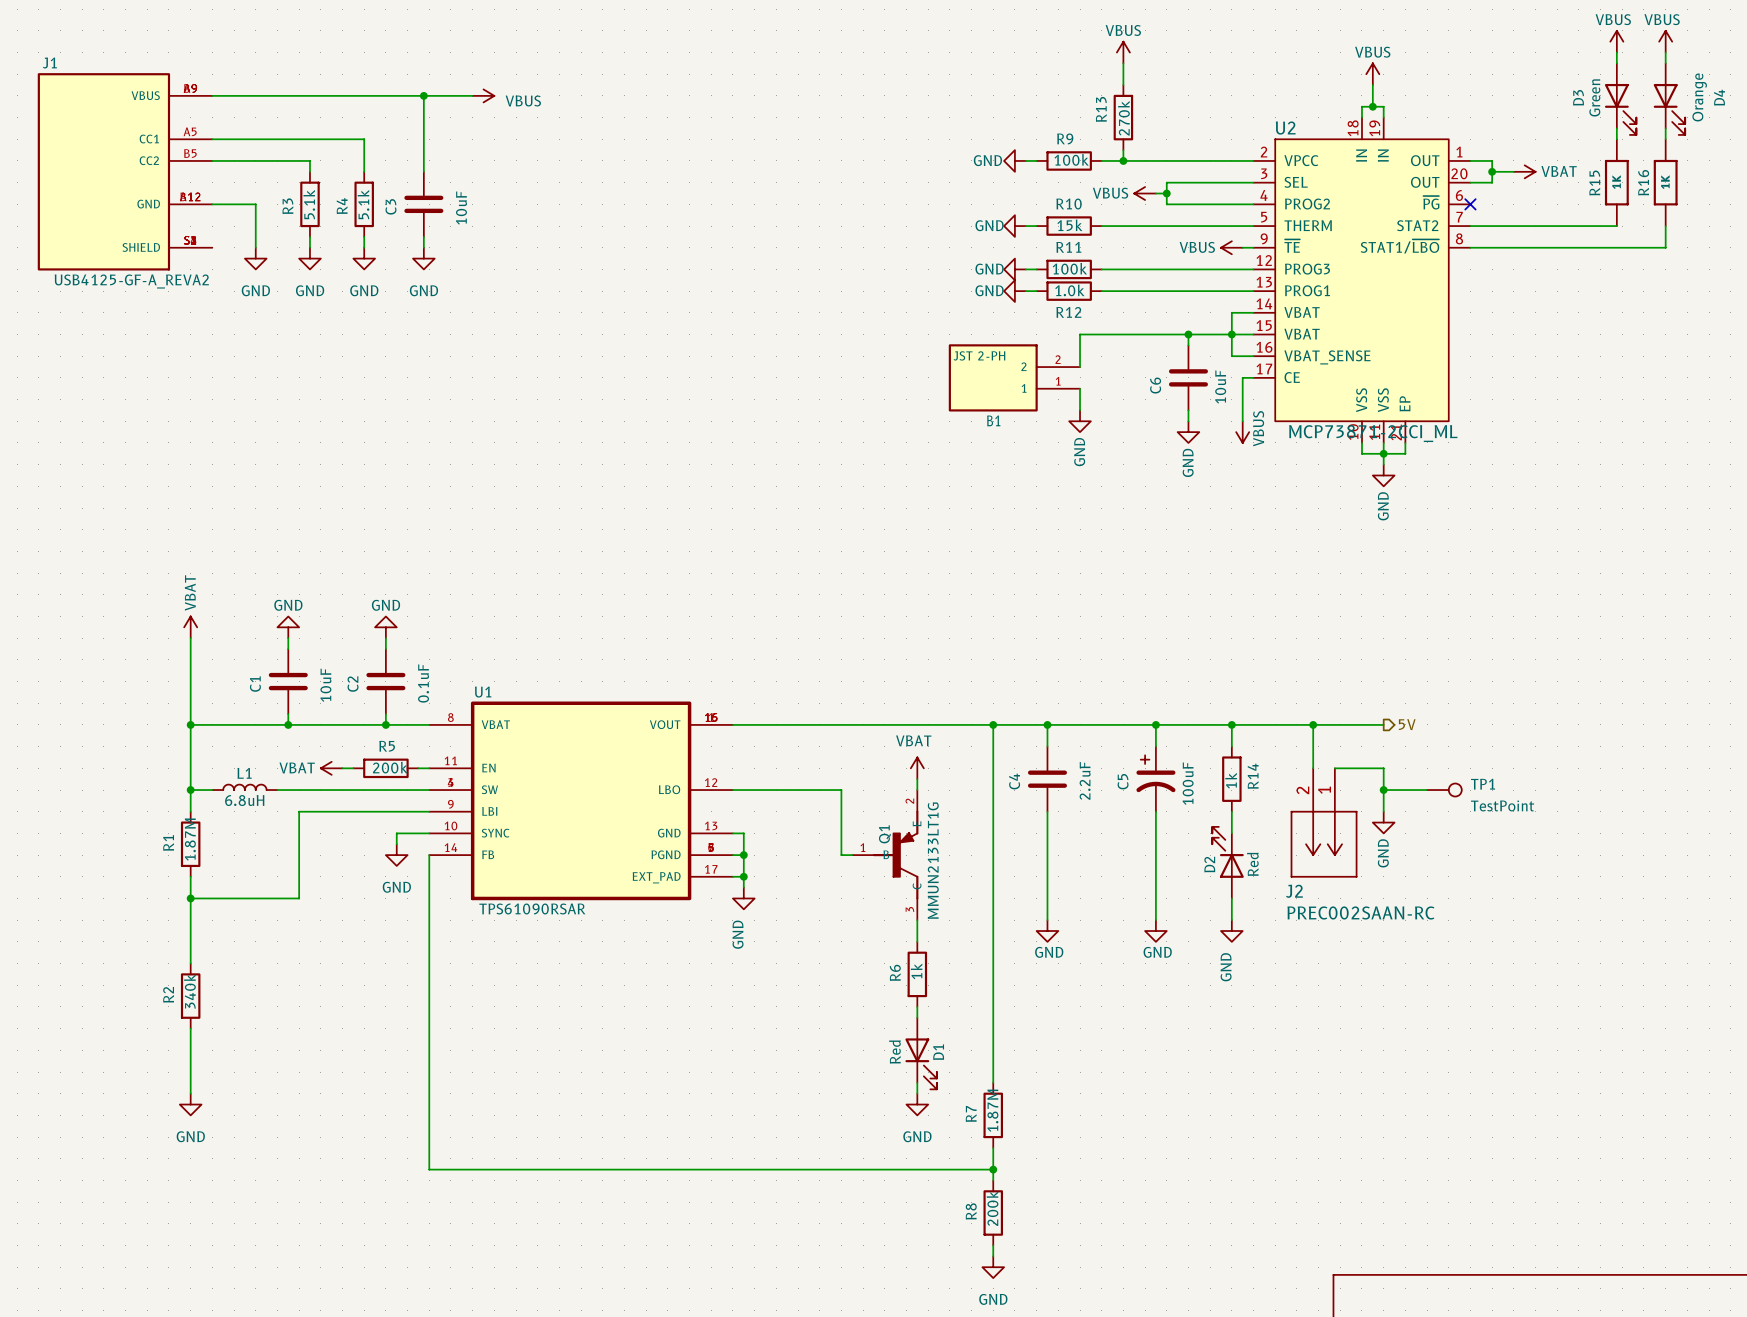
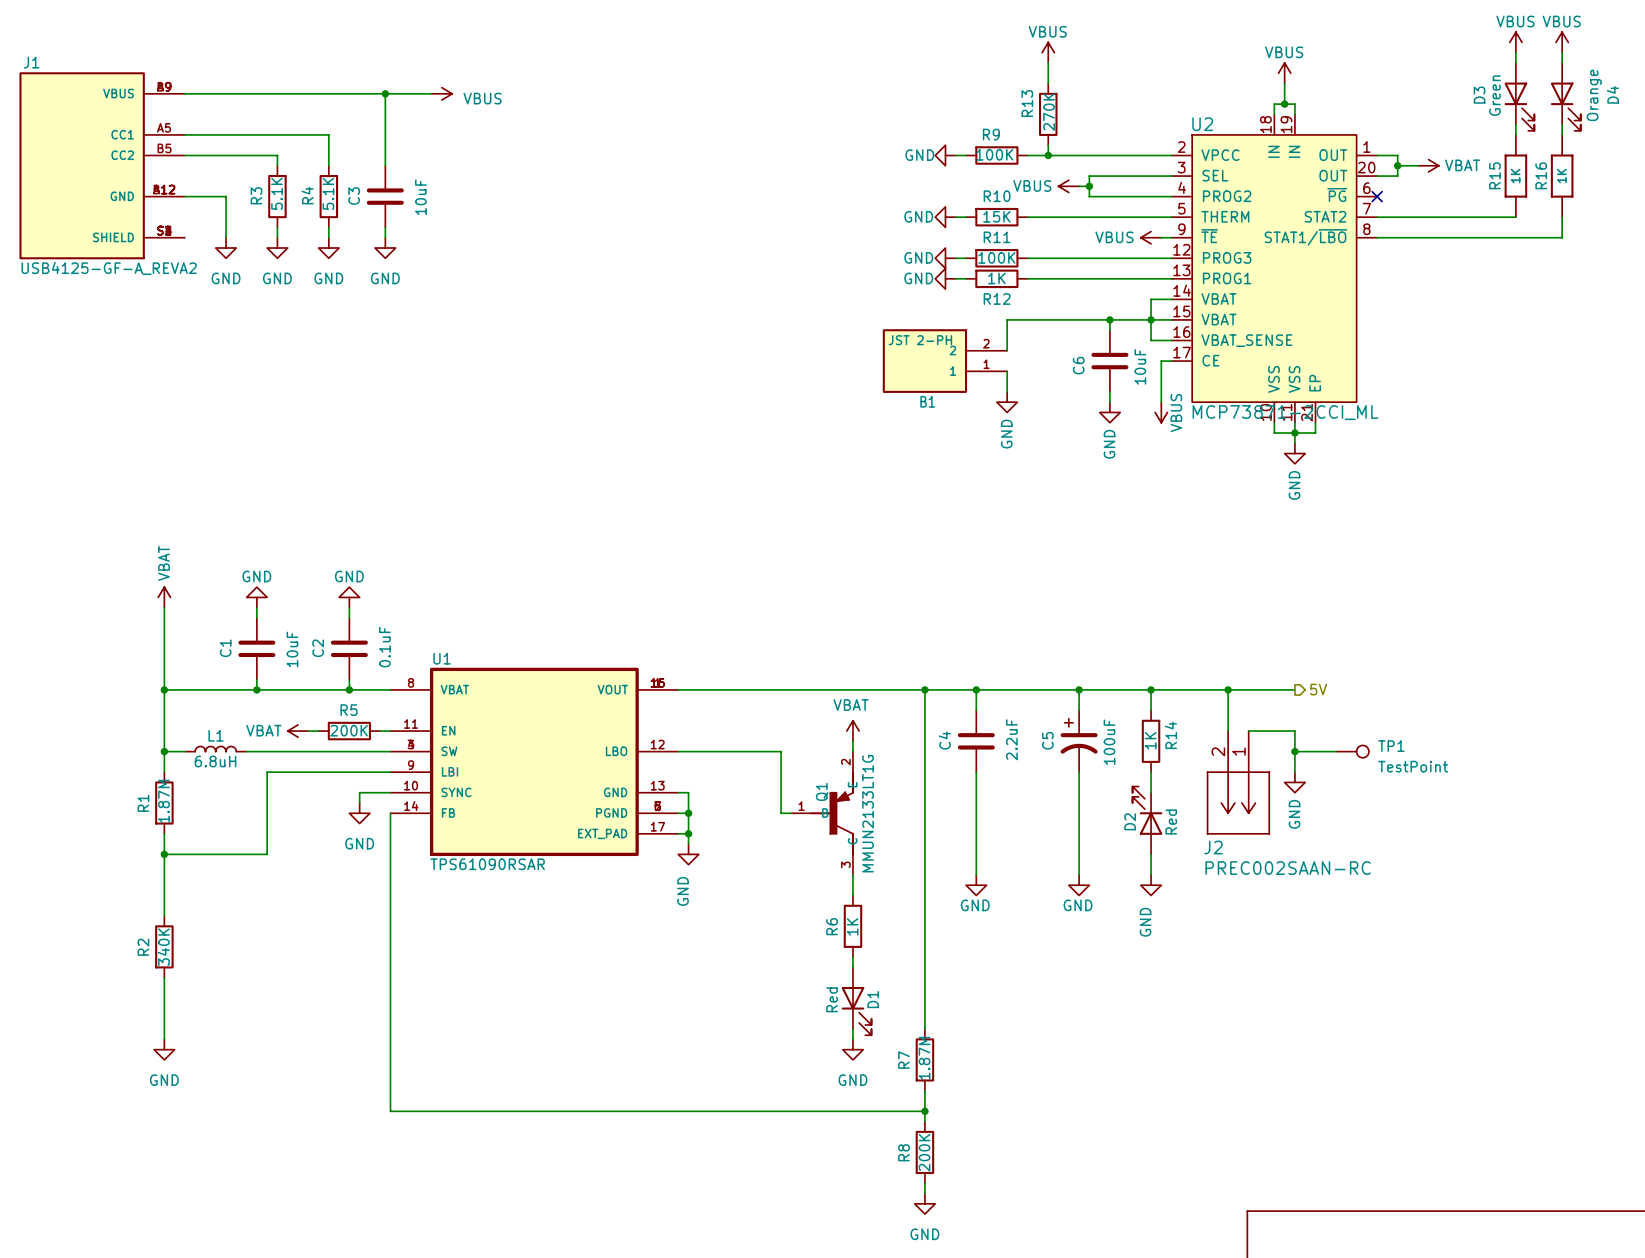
R13 value: 270k (1123, 118) -> 270K (1049, 112)
R9 value: 100k (1071, 159) -> 100K (994, 154)
R3 value: 5.1k (309, 204) -> 5.1K (277, 193)
R4 value: 5.1k (363, 204) -> 5.1K (328, 193)
R10 value: 15k (1069, 225) -> 15K (996, 216)
R11 value: 100k (1069, 268) -> 100K (996, 257)
R12 value: 1.0k (1069, 290) -> 1K (996, 278)
R5 value: 200k (390, 767) -> 200K (349, 730)
R14 value: 1k (1231, 780) -> 1K (1150, 740)
R6 value: 1k (916, 971) -> 1K (852, 926)
R2 value: 340k (189, 991) -> 340K (163, 947)
R8 value: 200k (992, 1208) -> 200K (924, 1152)

